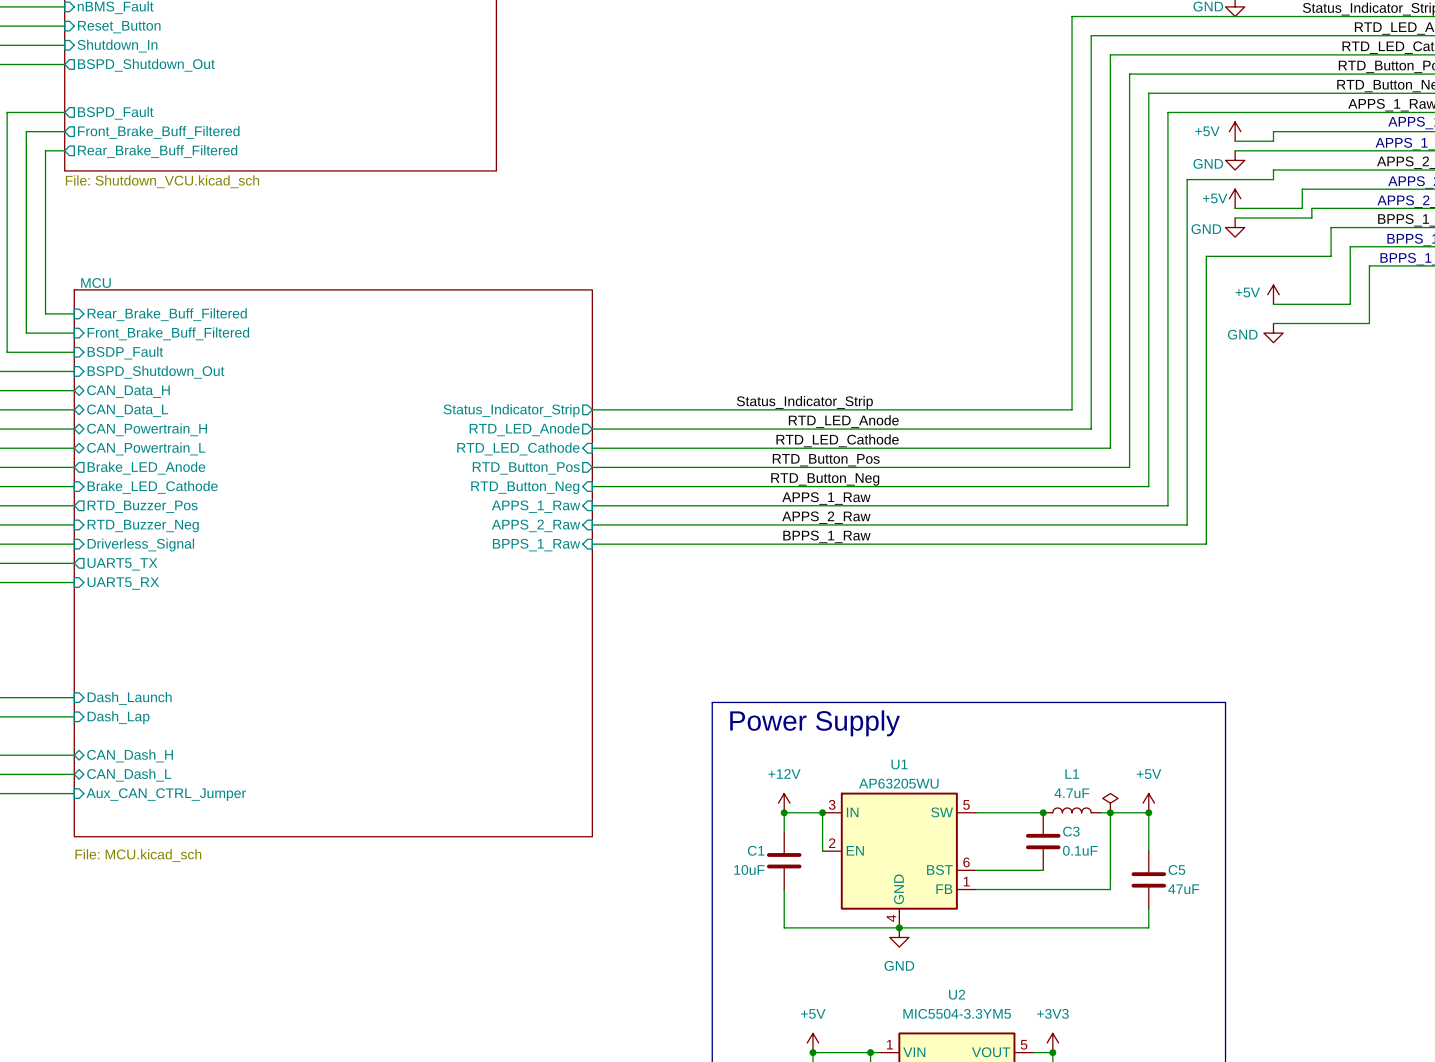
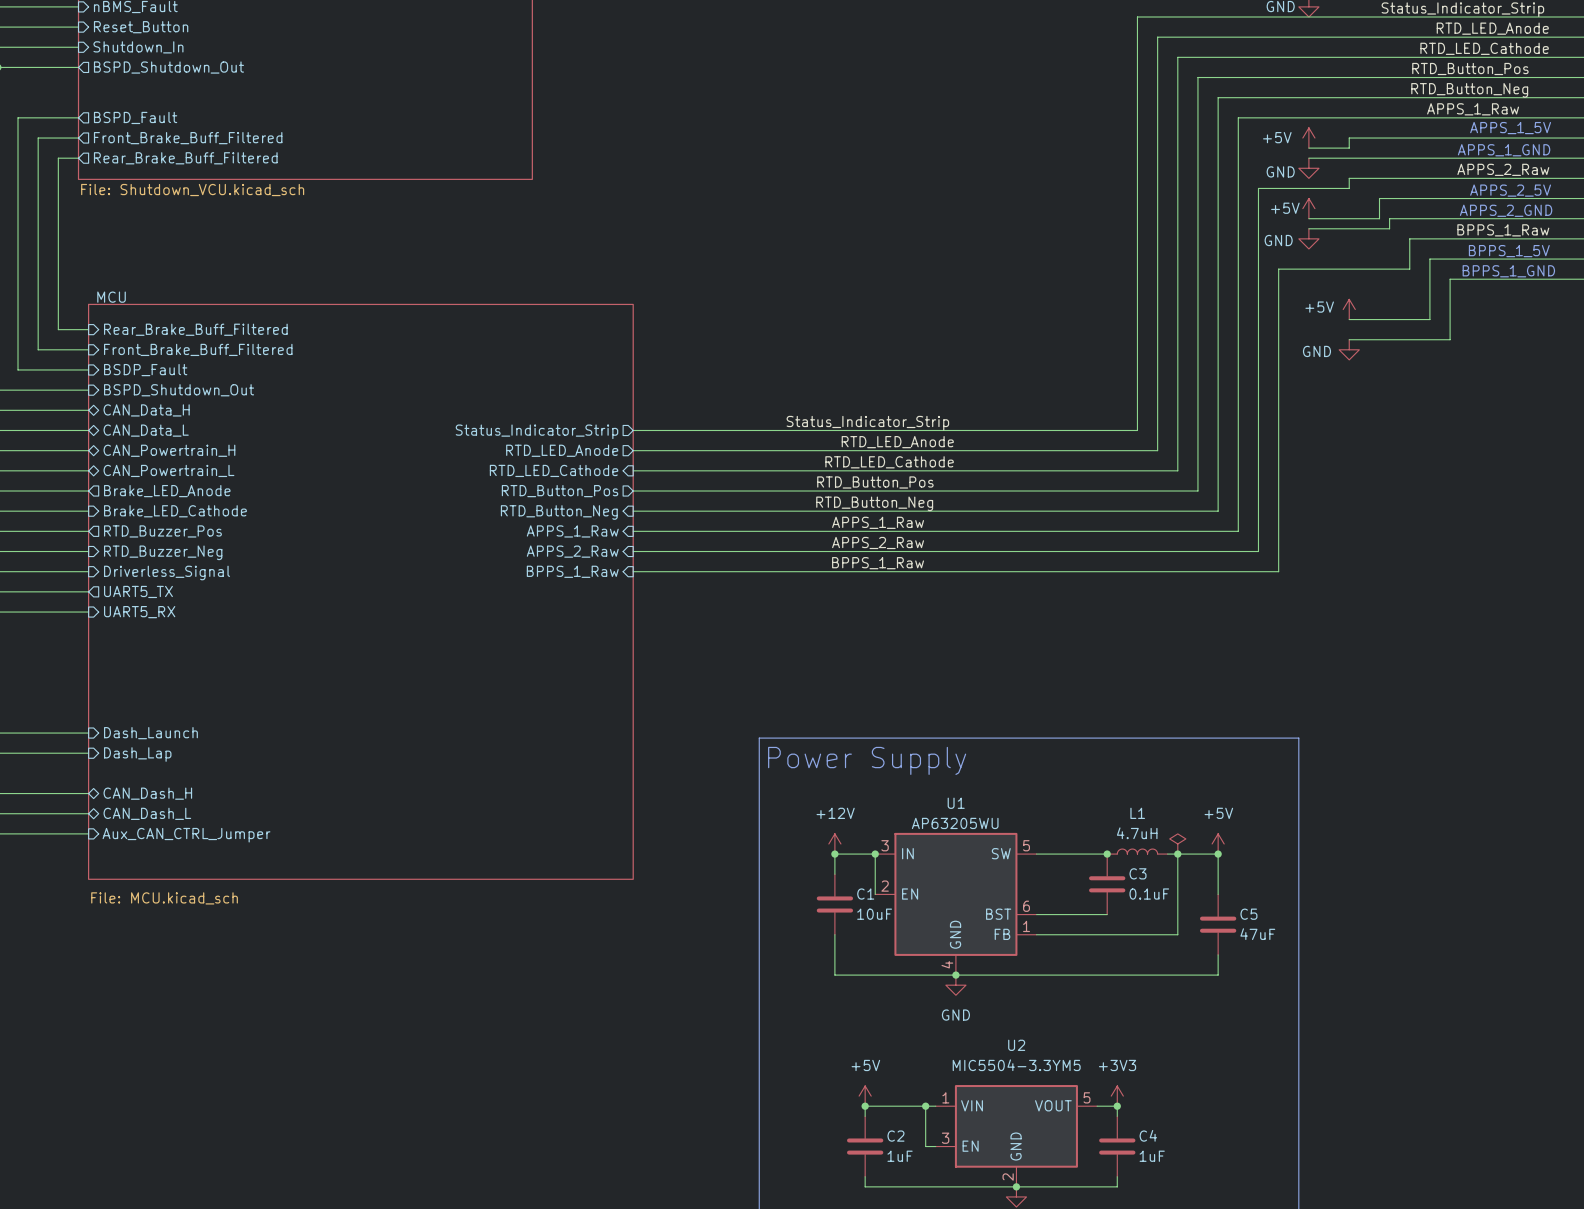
L1 value: 4.7uF (1071, 793) -> 4.7uH (1137, 833)
C1 name position: C1 (756, 850) -> C1 (865, 894)
C1 value position: 10uF (749, 869) -> 10uF (874, 914)

